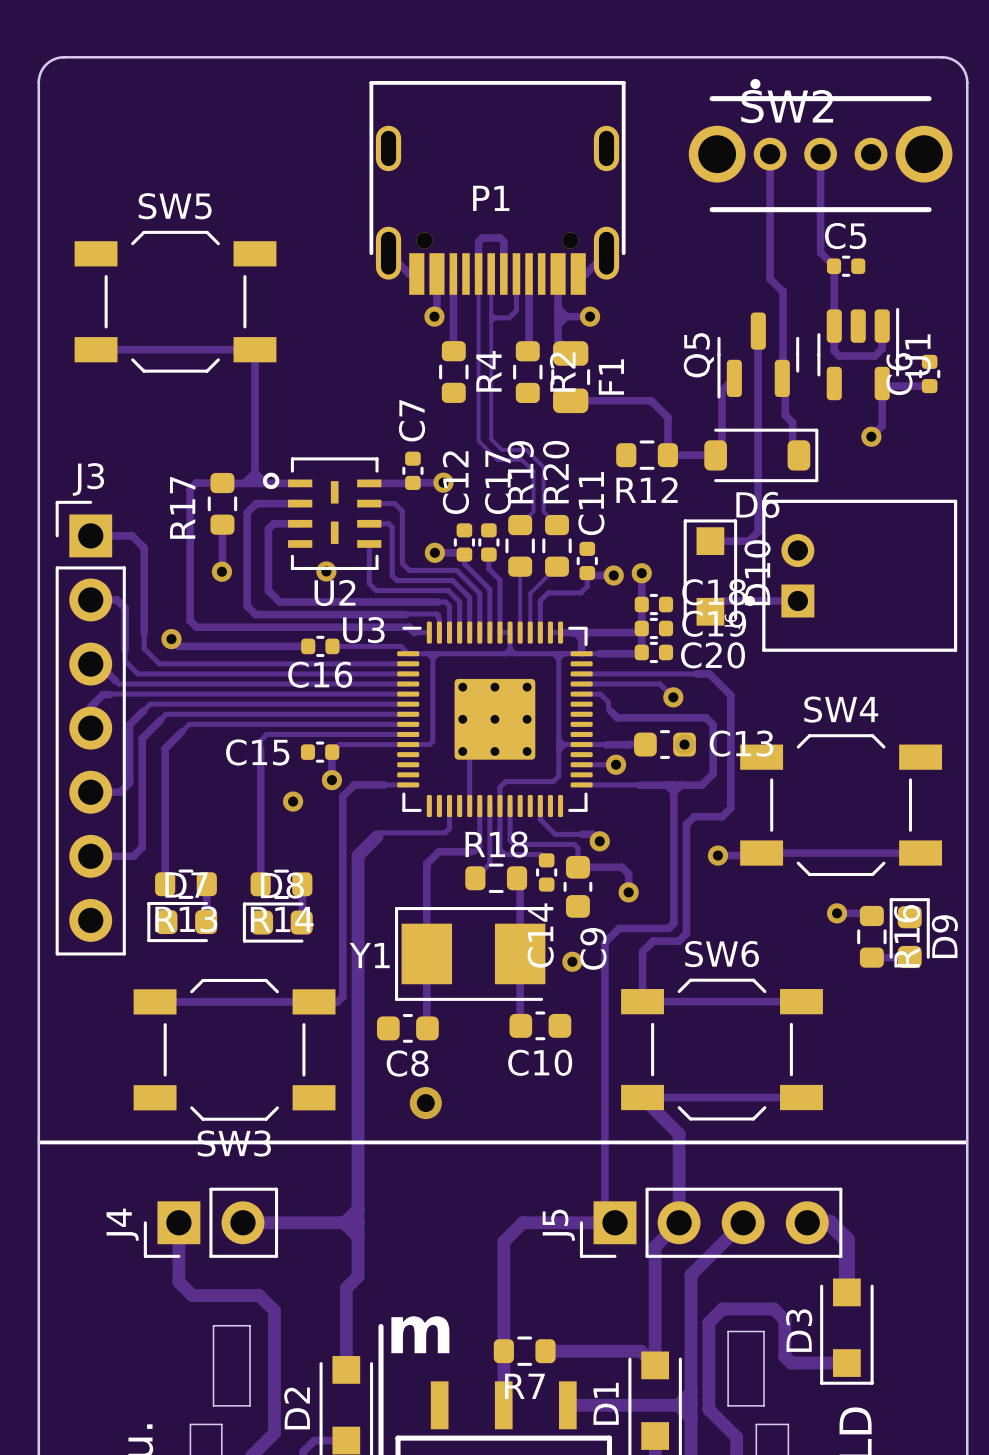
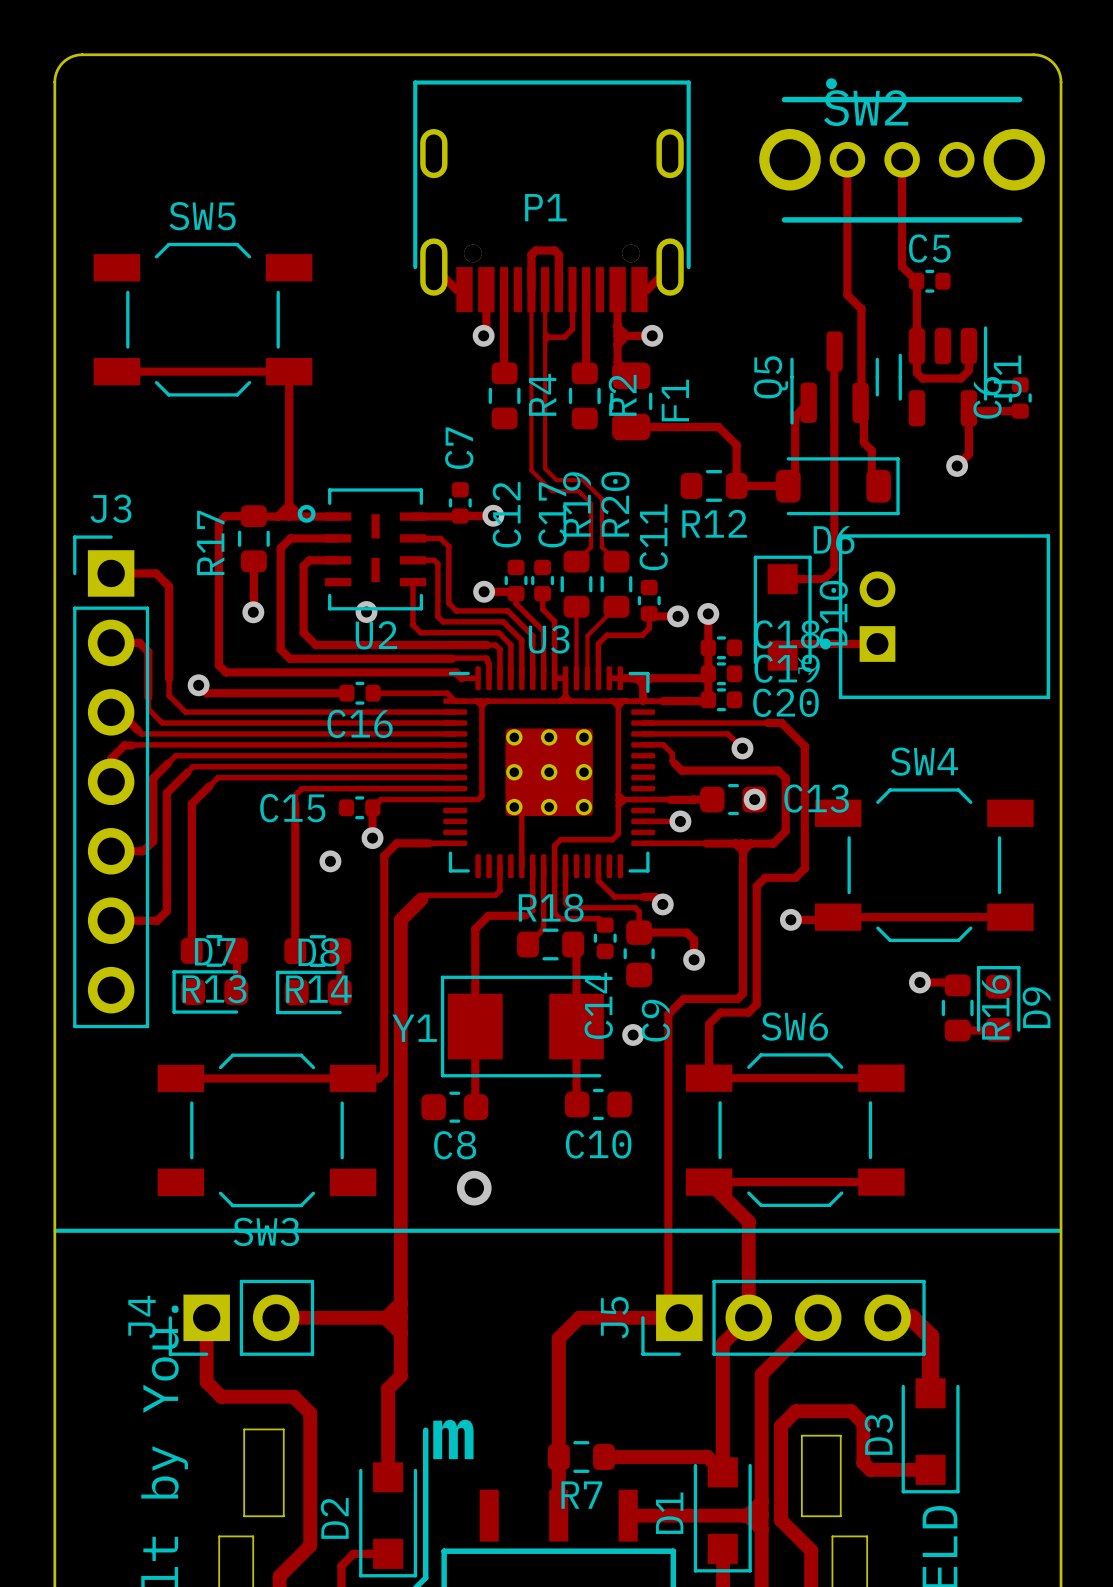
U3 name position: U3 (363, 630) -> U3 (549, 639)

